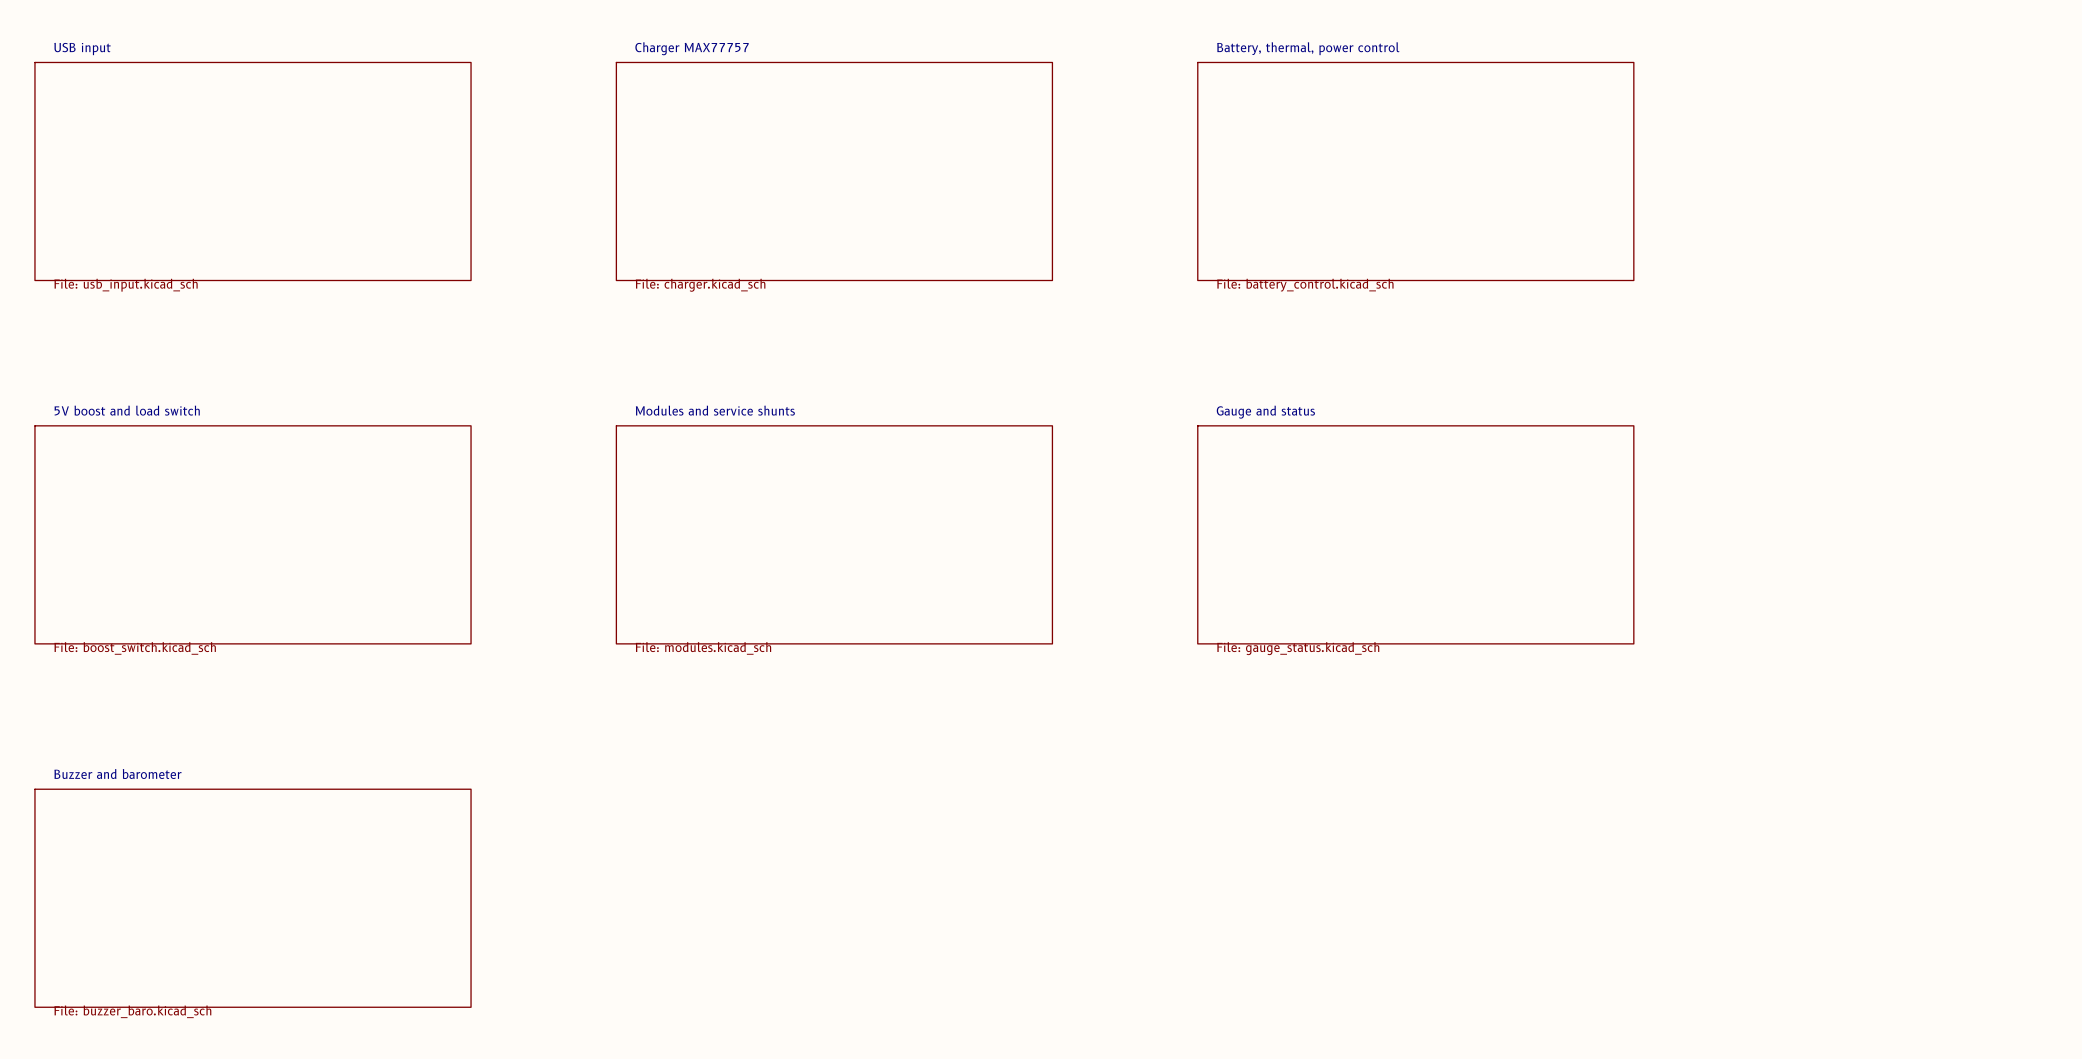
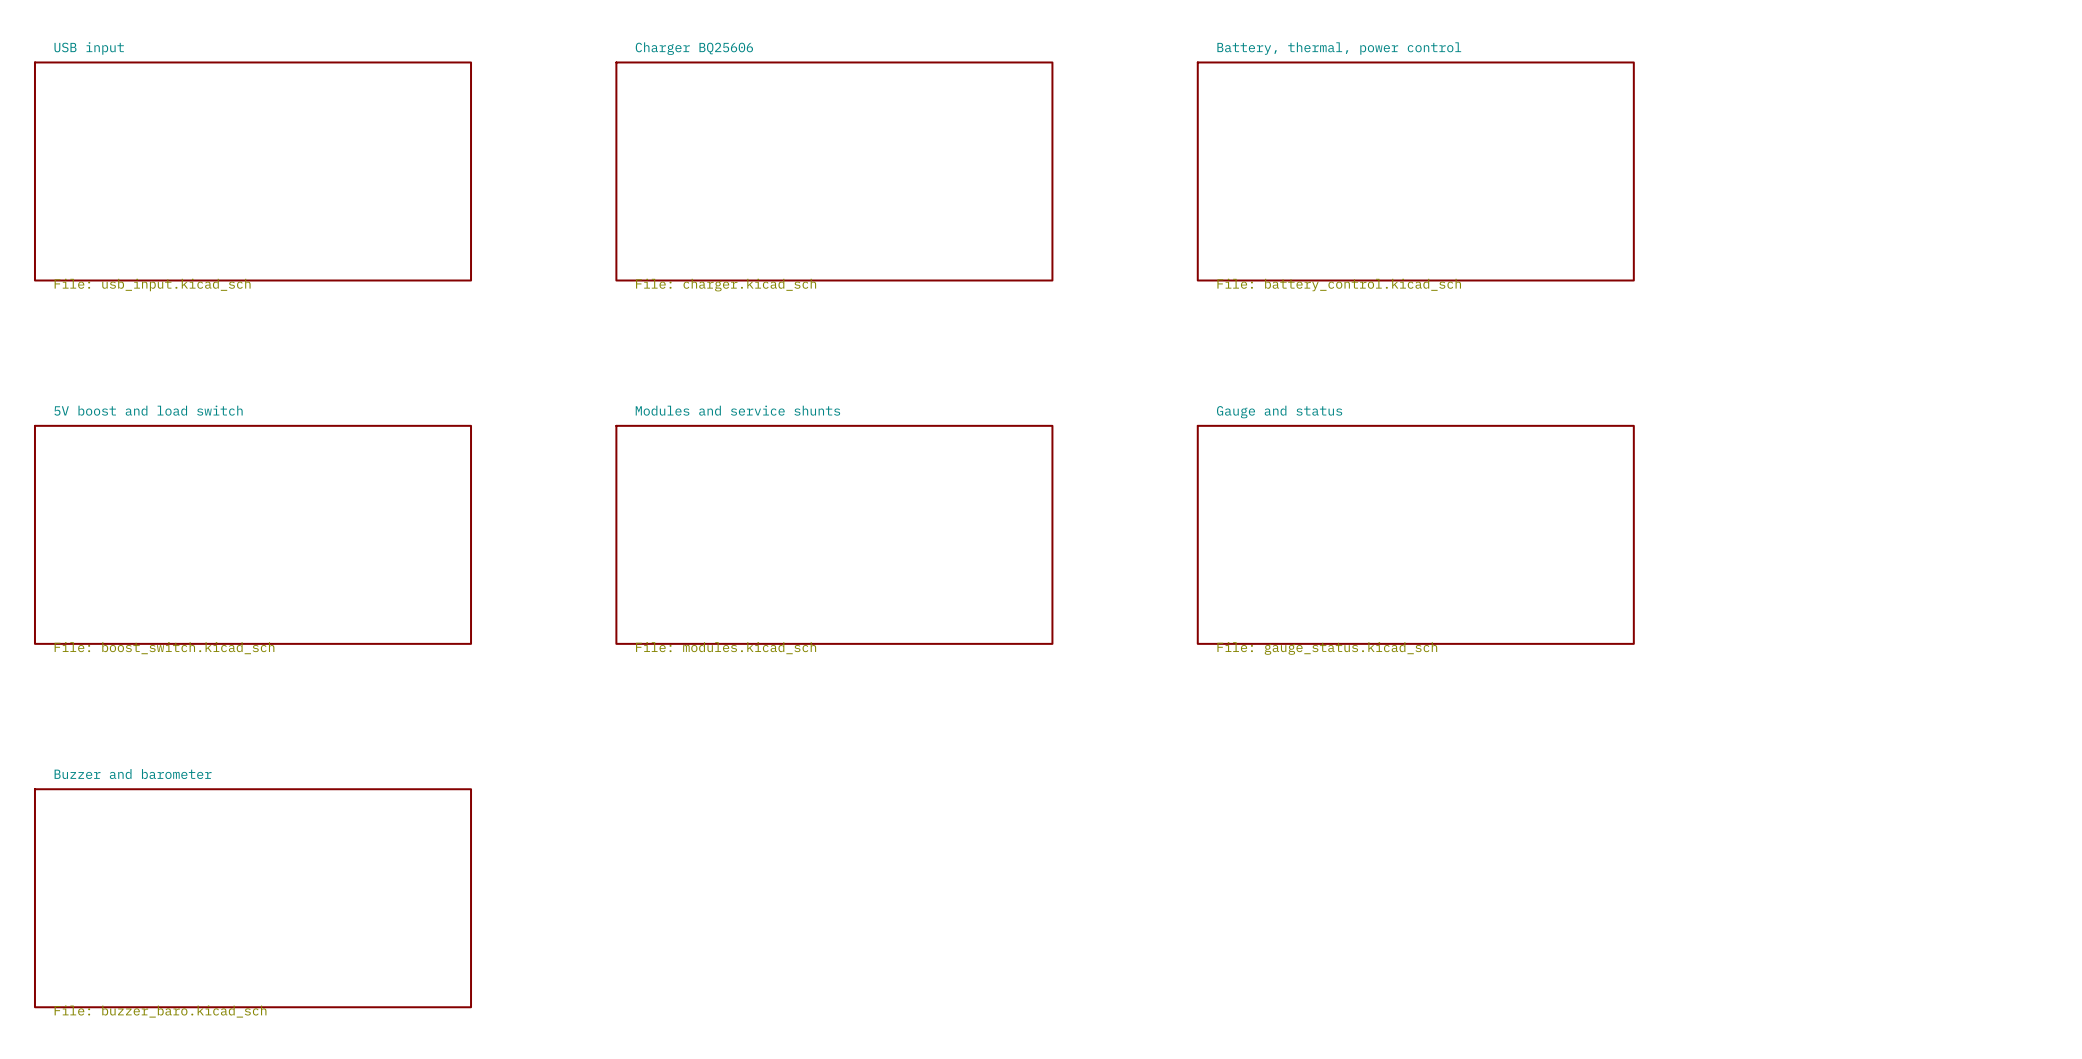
sheet Charger MAX77757 name: Charger MAX77757 (692, 48) -> Charger BQ25606 (694, 48)

